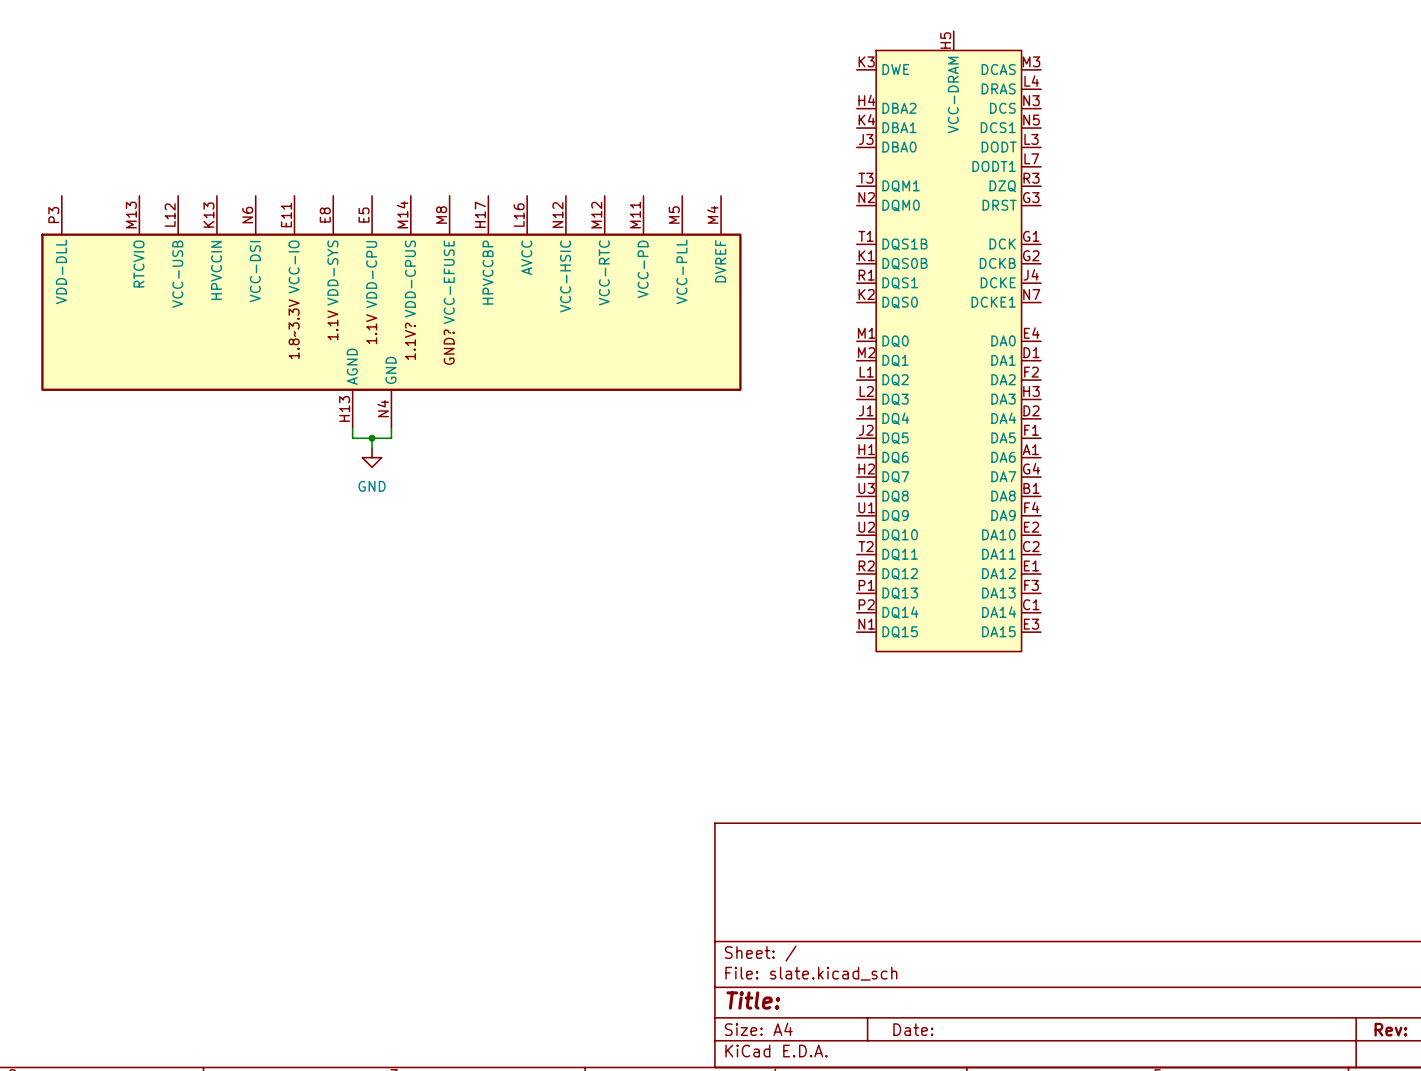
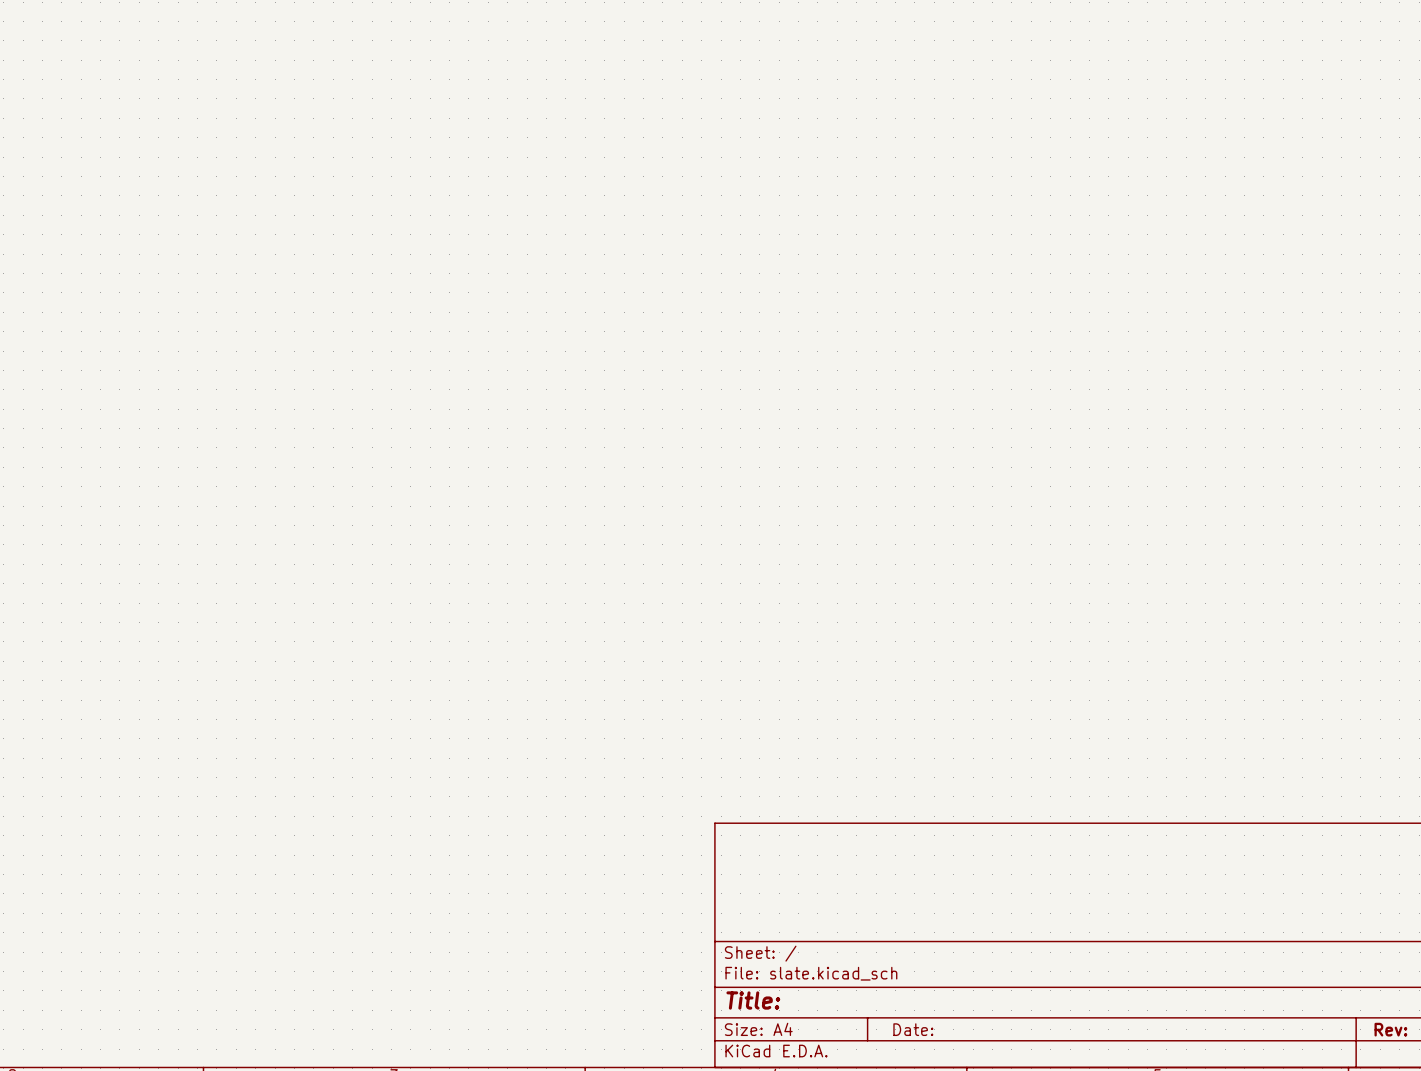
part: (391, 312) -> none
part: (948, 341) -> none
wire: (352, 428) (352, 438) (391, 438) (391, 428) -> none
wire: (372, 438) (372, 447) -> none
junction: (372, 438) -> none
power symbol: GND (372, 457) -> none

